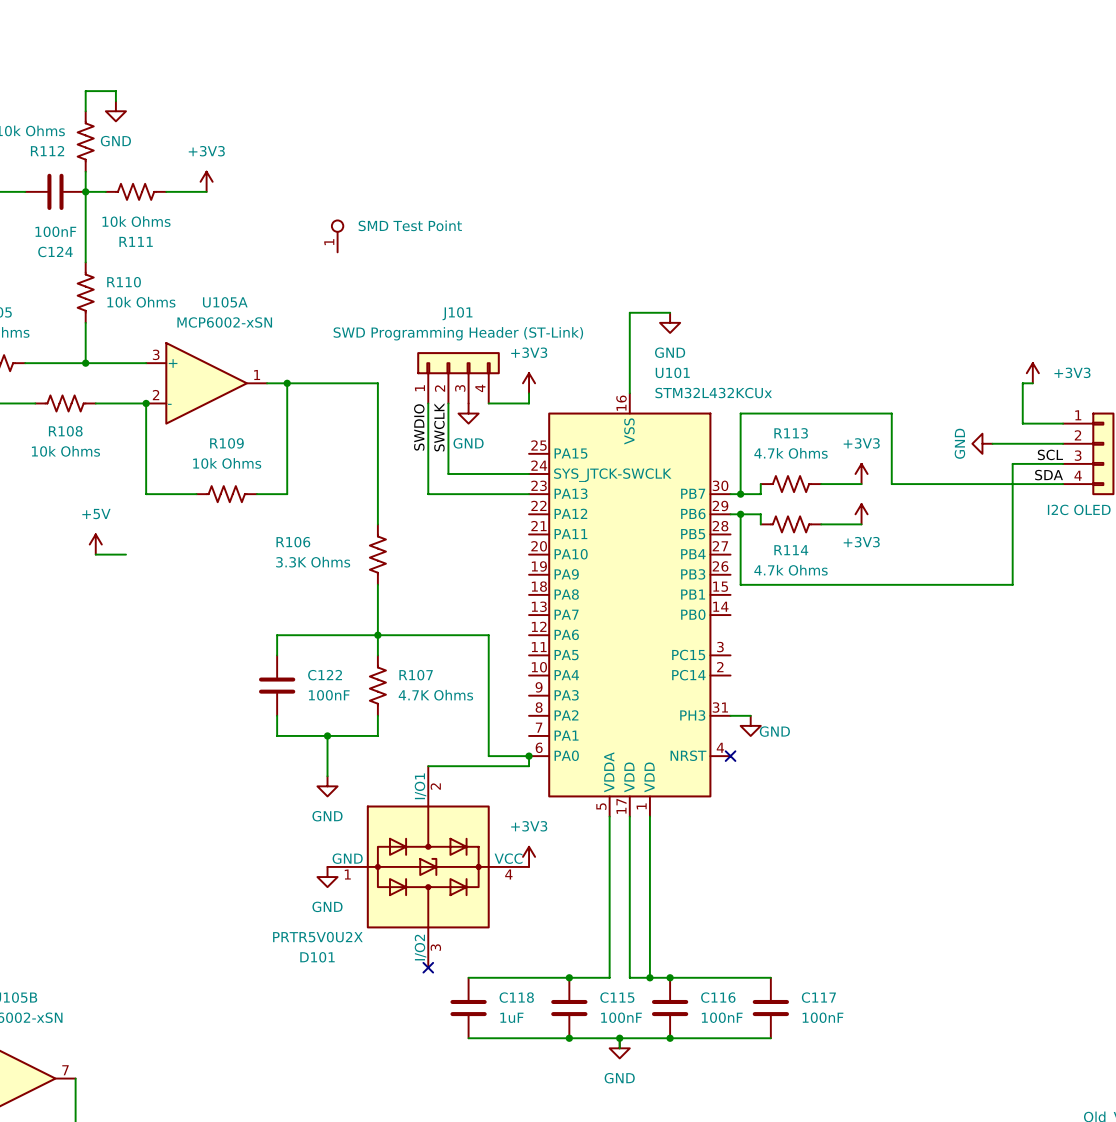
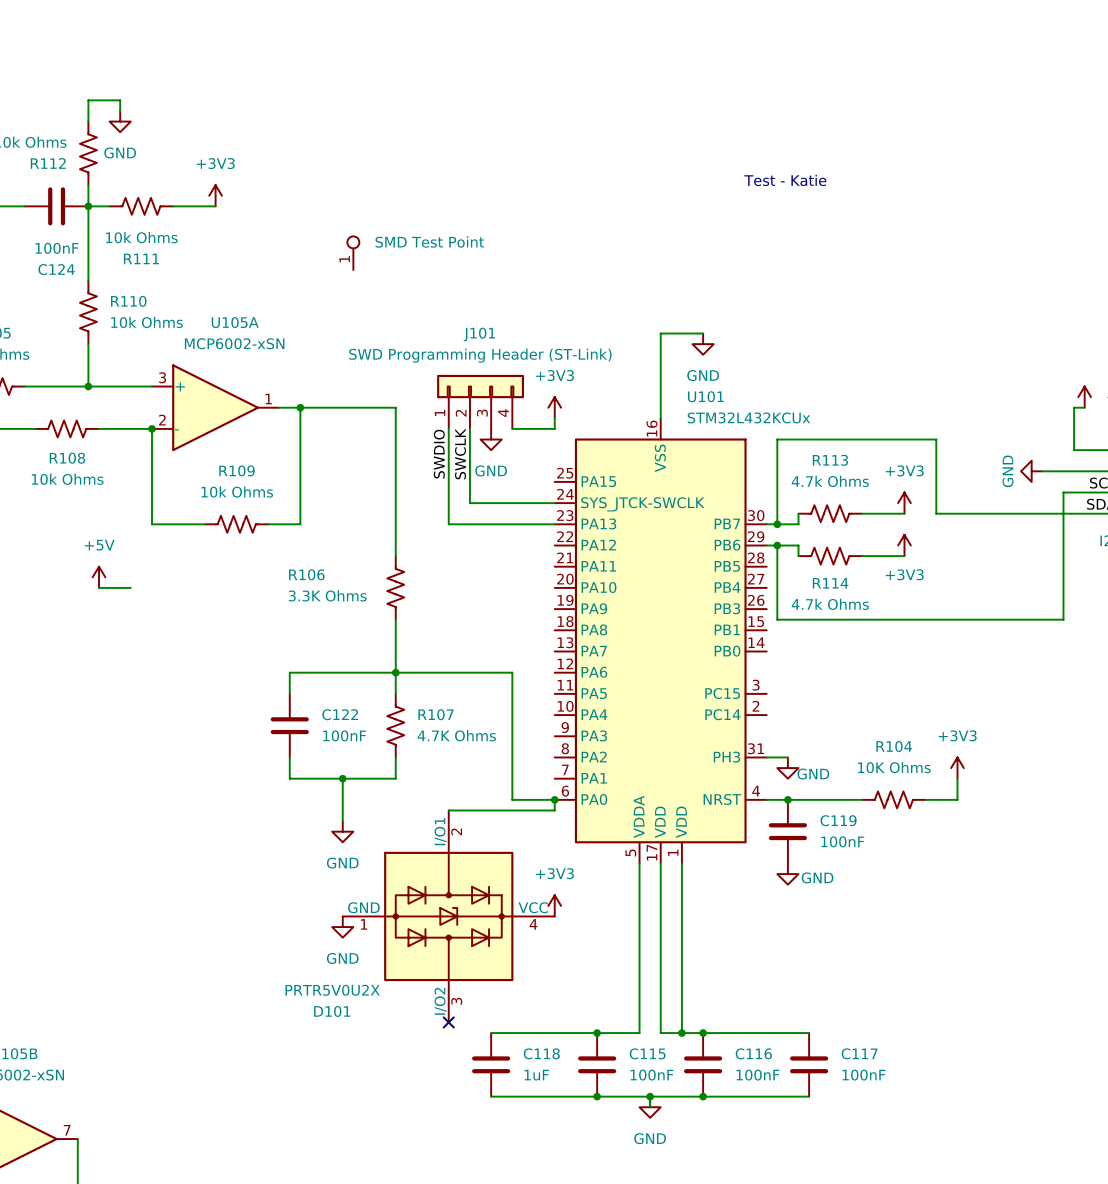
text: none -> Test - Katie (785, 180)
power symbol: none -> +3V3 (957, 768)
wire: none -> (957, 778) (957, 799) (925, 799)
wire: none -> (766, 799) (862, 799)
no-connect mark: (730, 756) -> none
junction: none -> (787, 799)
R104: none -> 10K Ohms (893, 799)
C119: none -> 100nF (787, 831)
power symbol: none -> GND (787, 874)

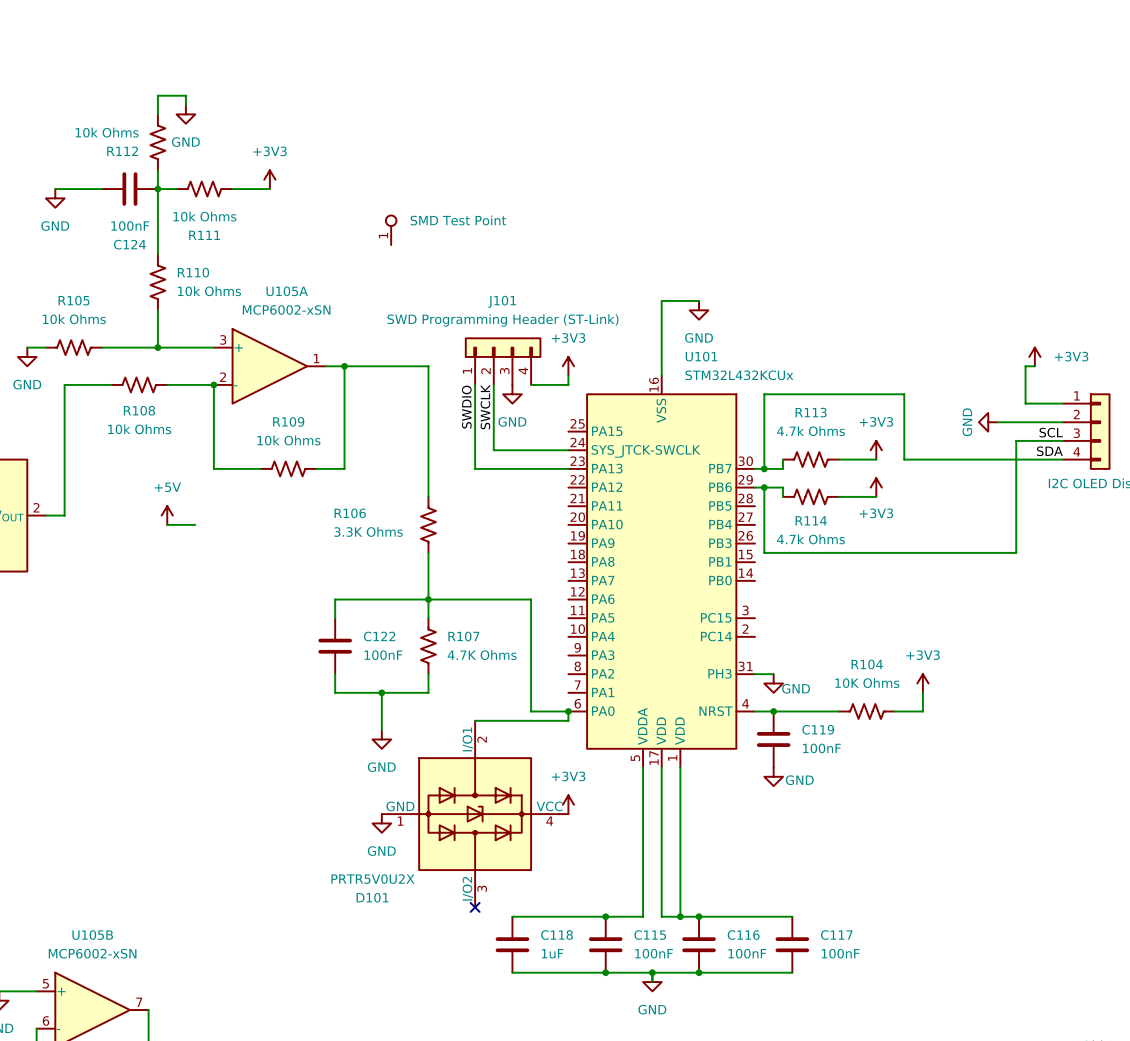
text: Test - Katie (785, 180) -> none

